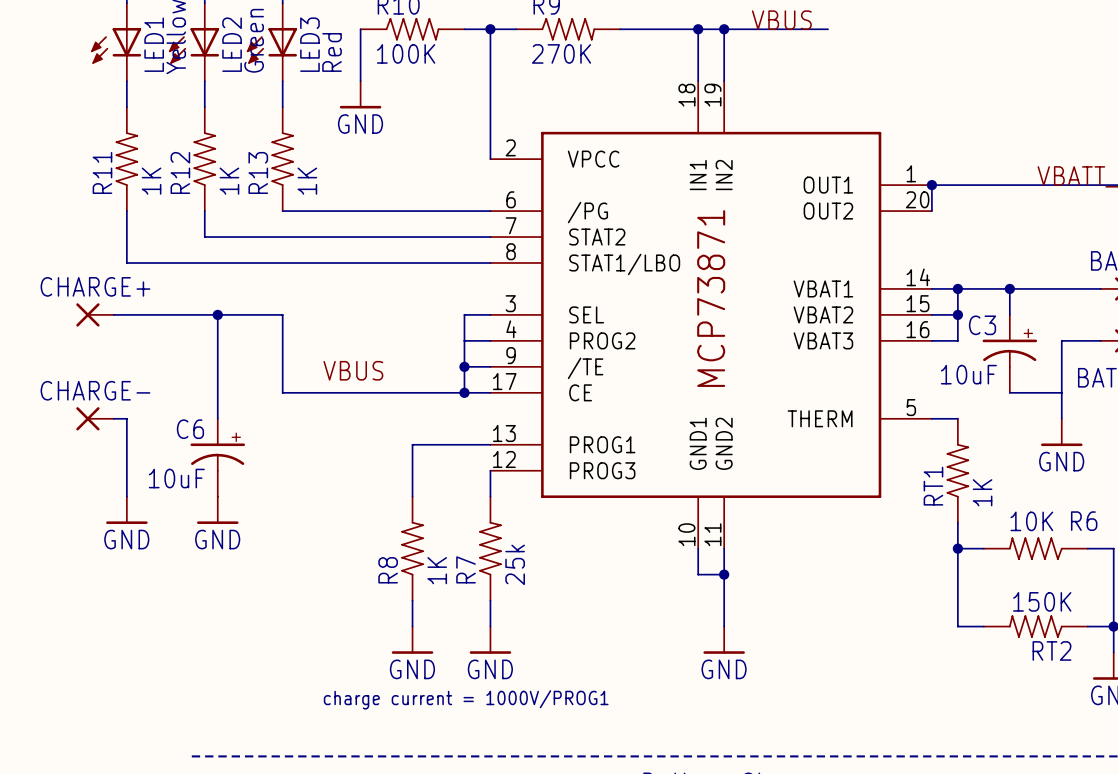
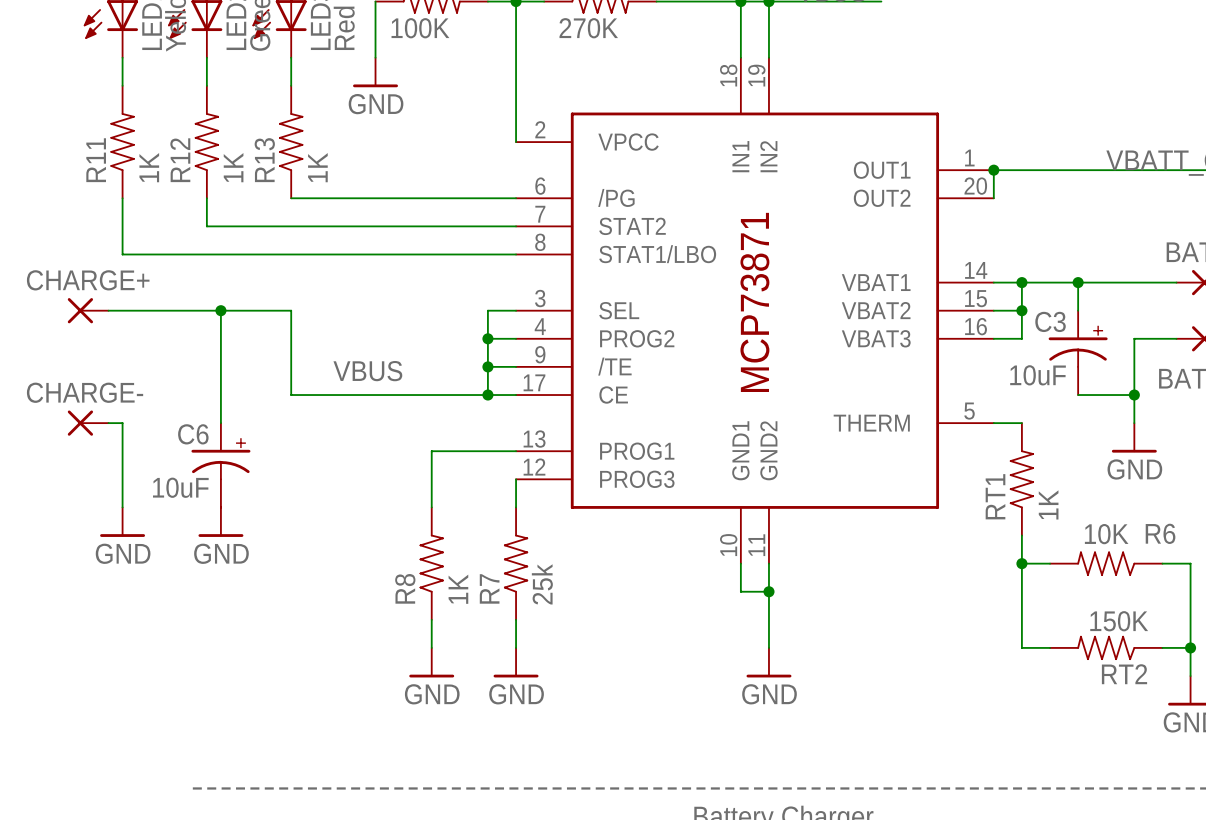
junction: none -> (487, 338)
junction: none -> (1134, 395)
text: charge current = 1000V/PROG1 (466, 699) -> none

